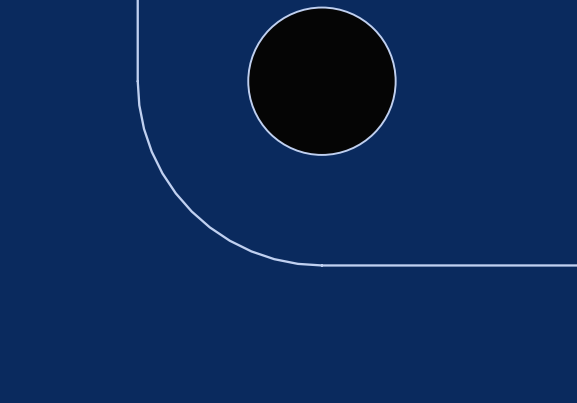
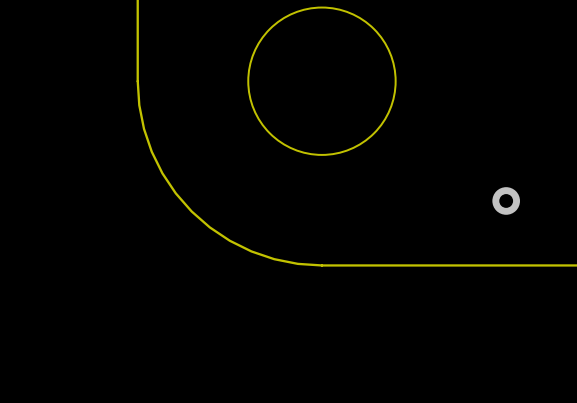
via: none -> (506, 200)

